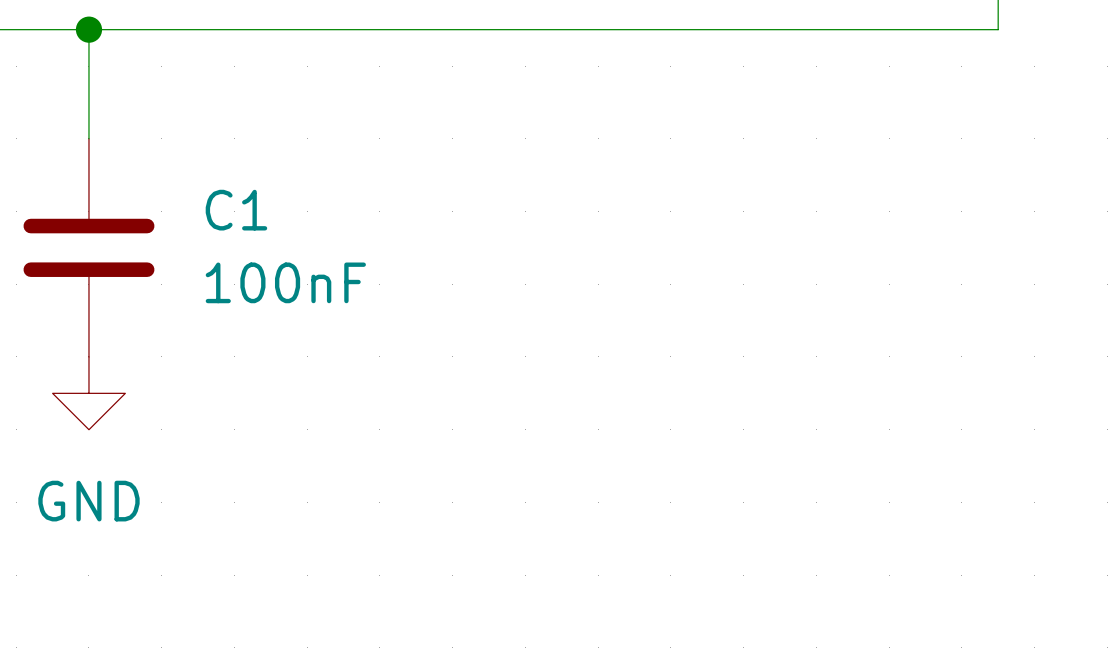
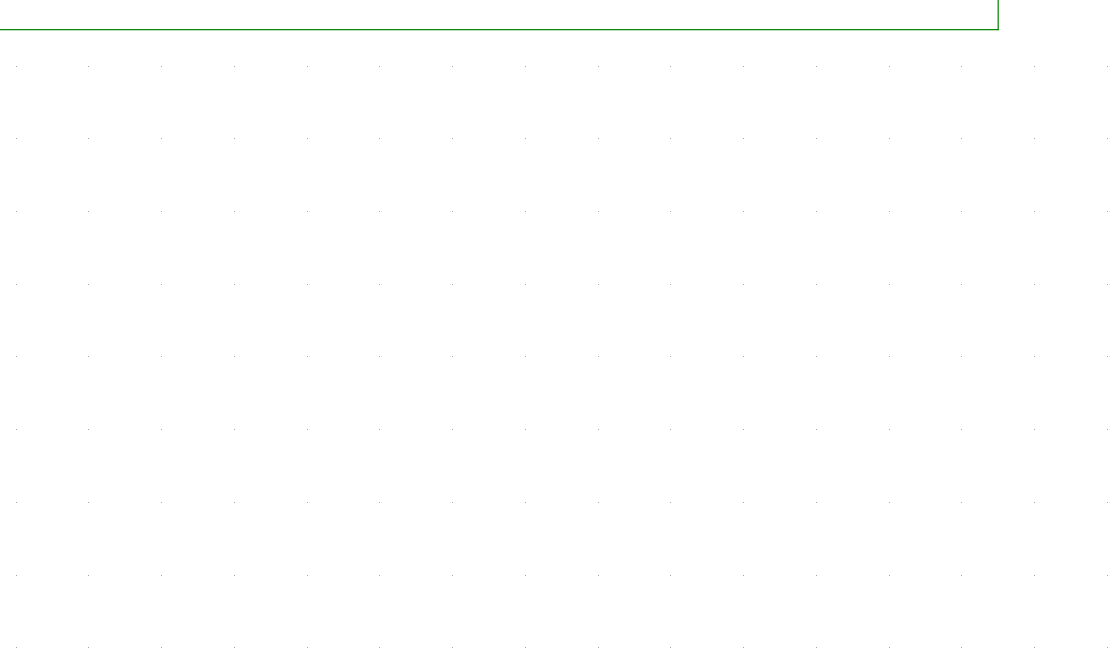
wire: (88, 29) (88, 138) -> none
junction: (88, 29) -> none
C1: 100nF (88, 247) -> none
power symbol: GND (88, 393) -> none

